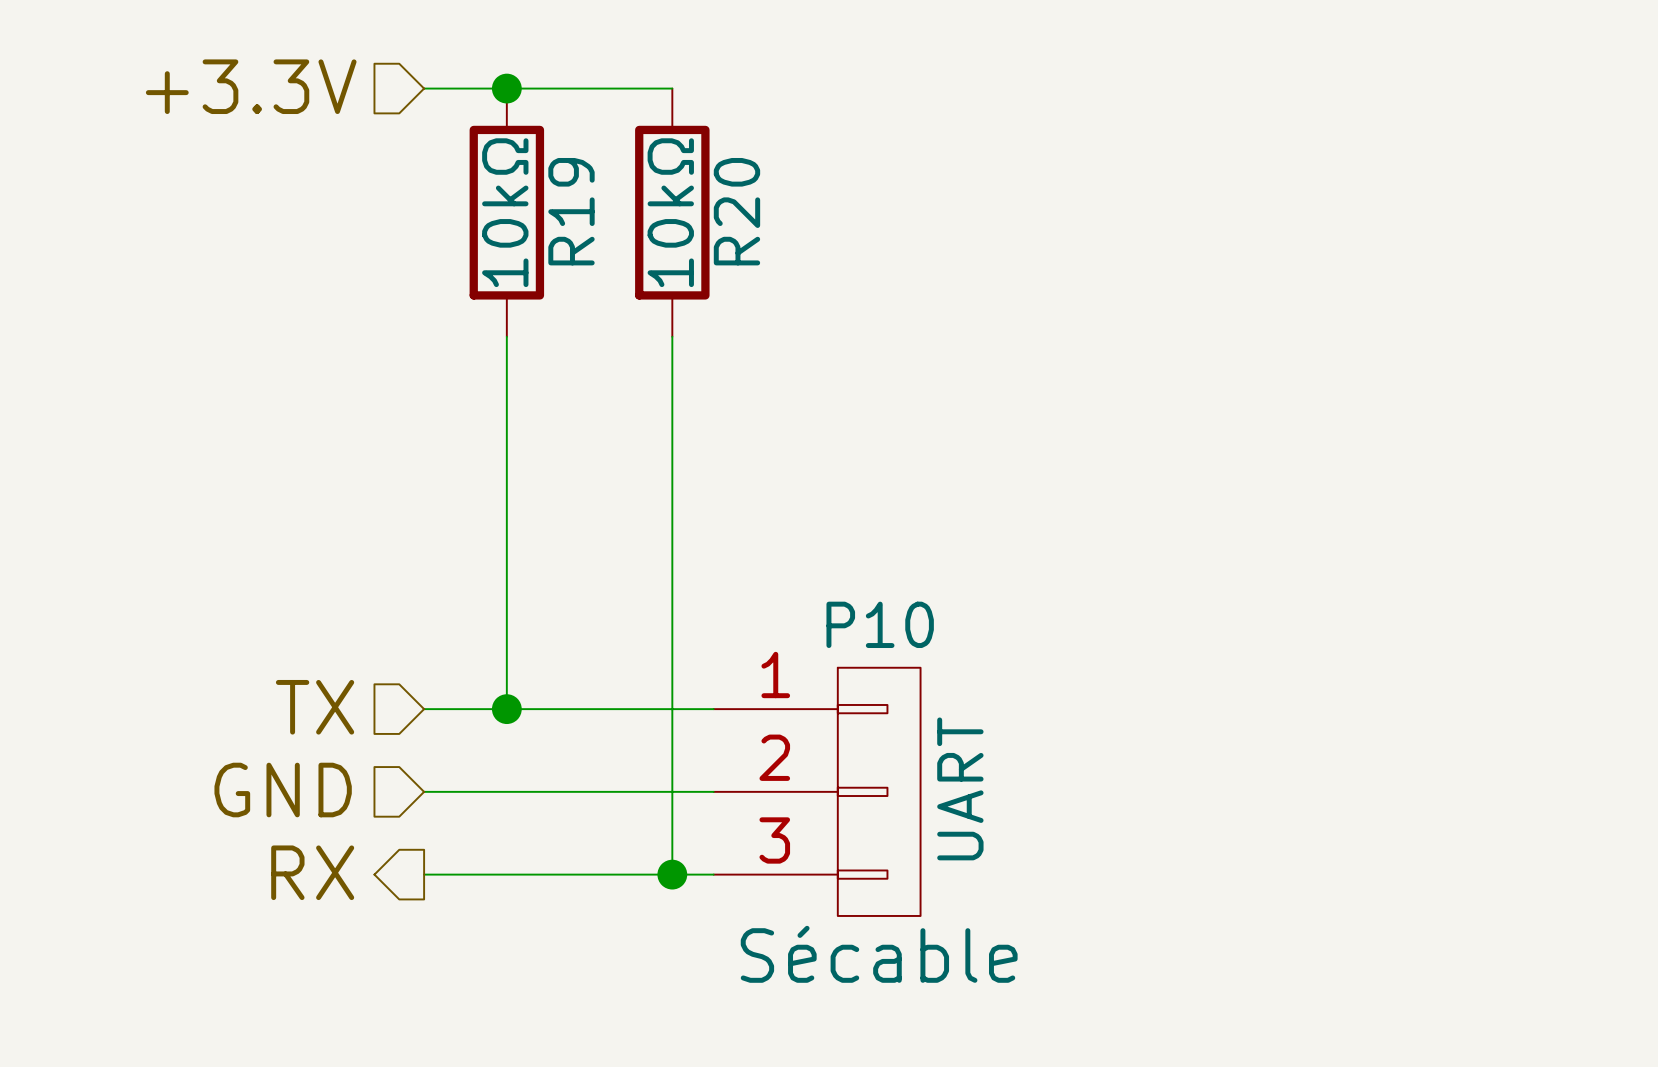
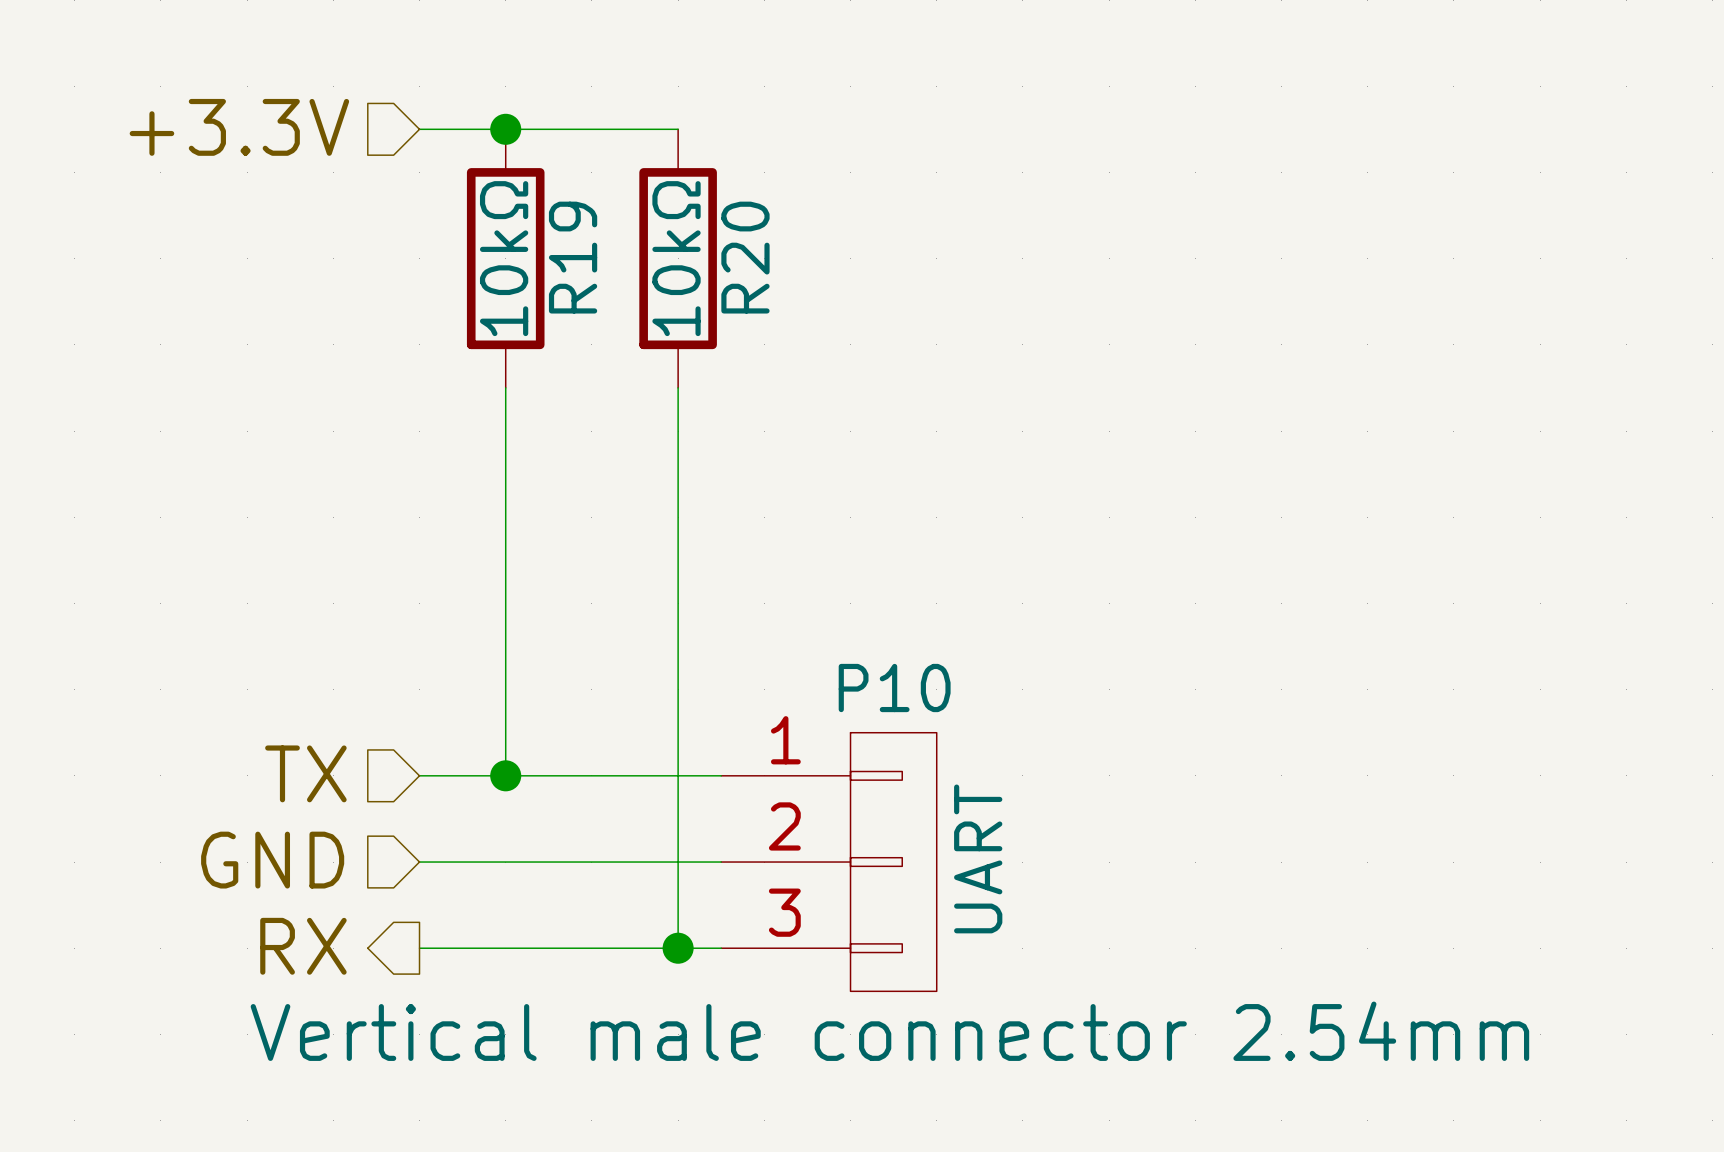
P10 text: Sécable (879, 954) -> Vertical male connector 2.54mm (889, 1031)

